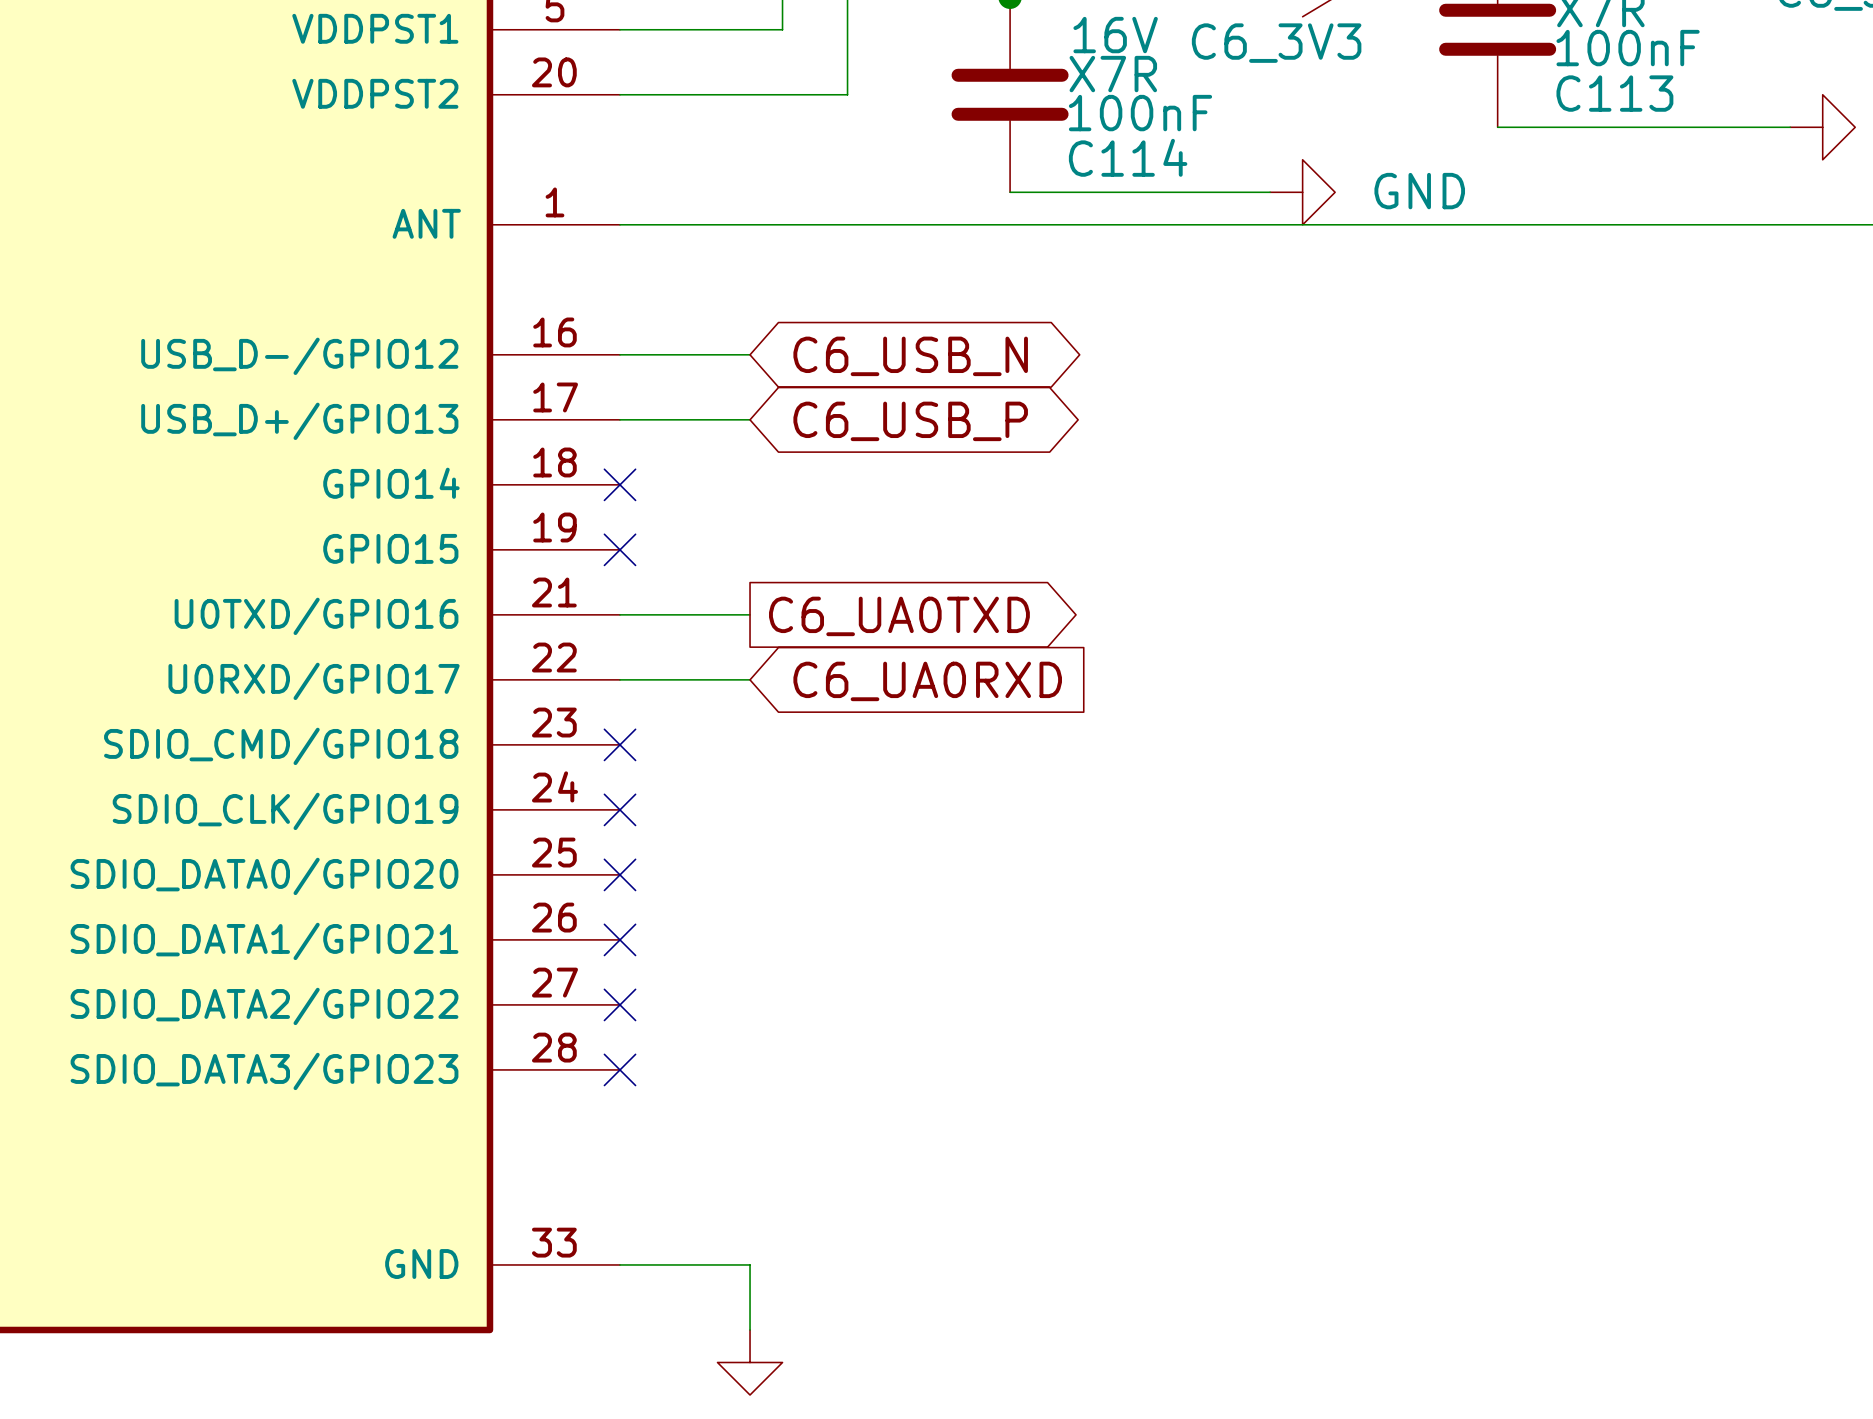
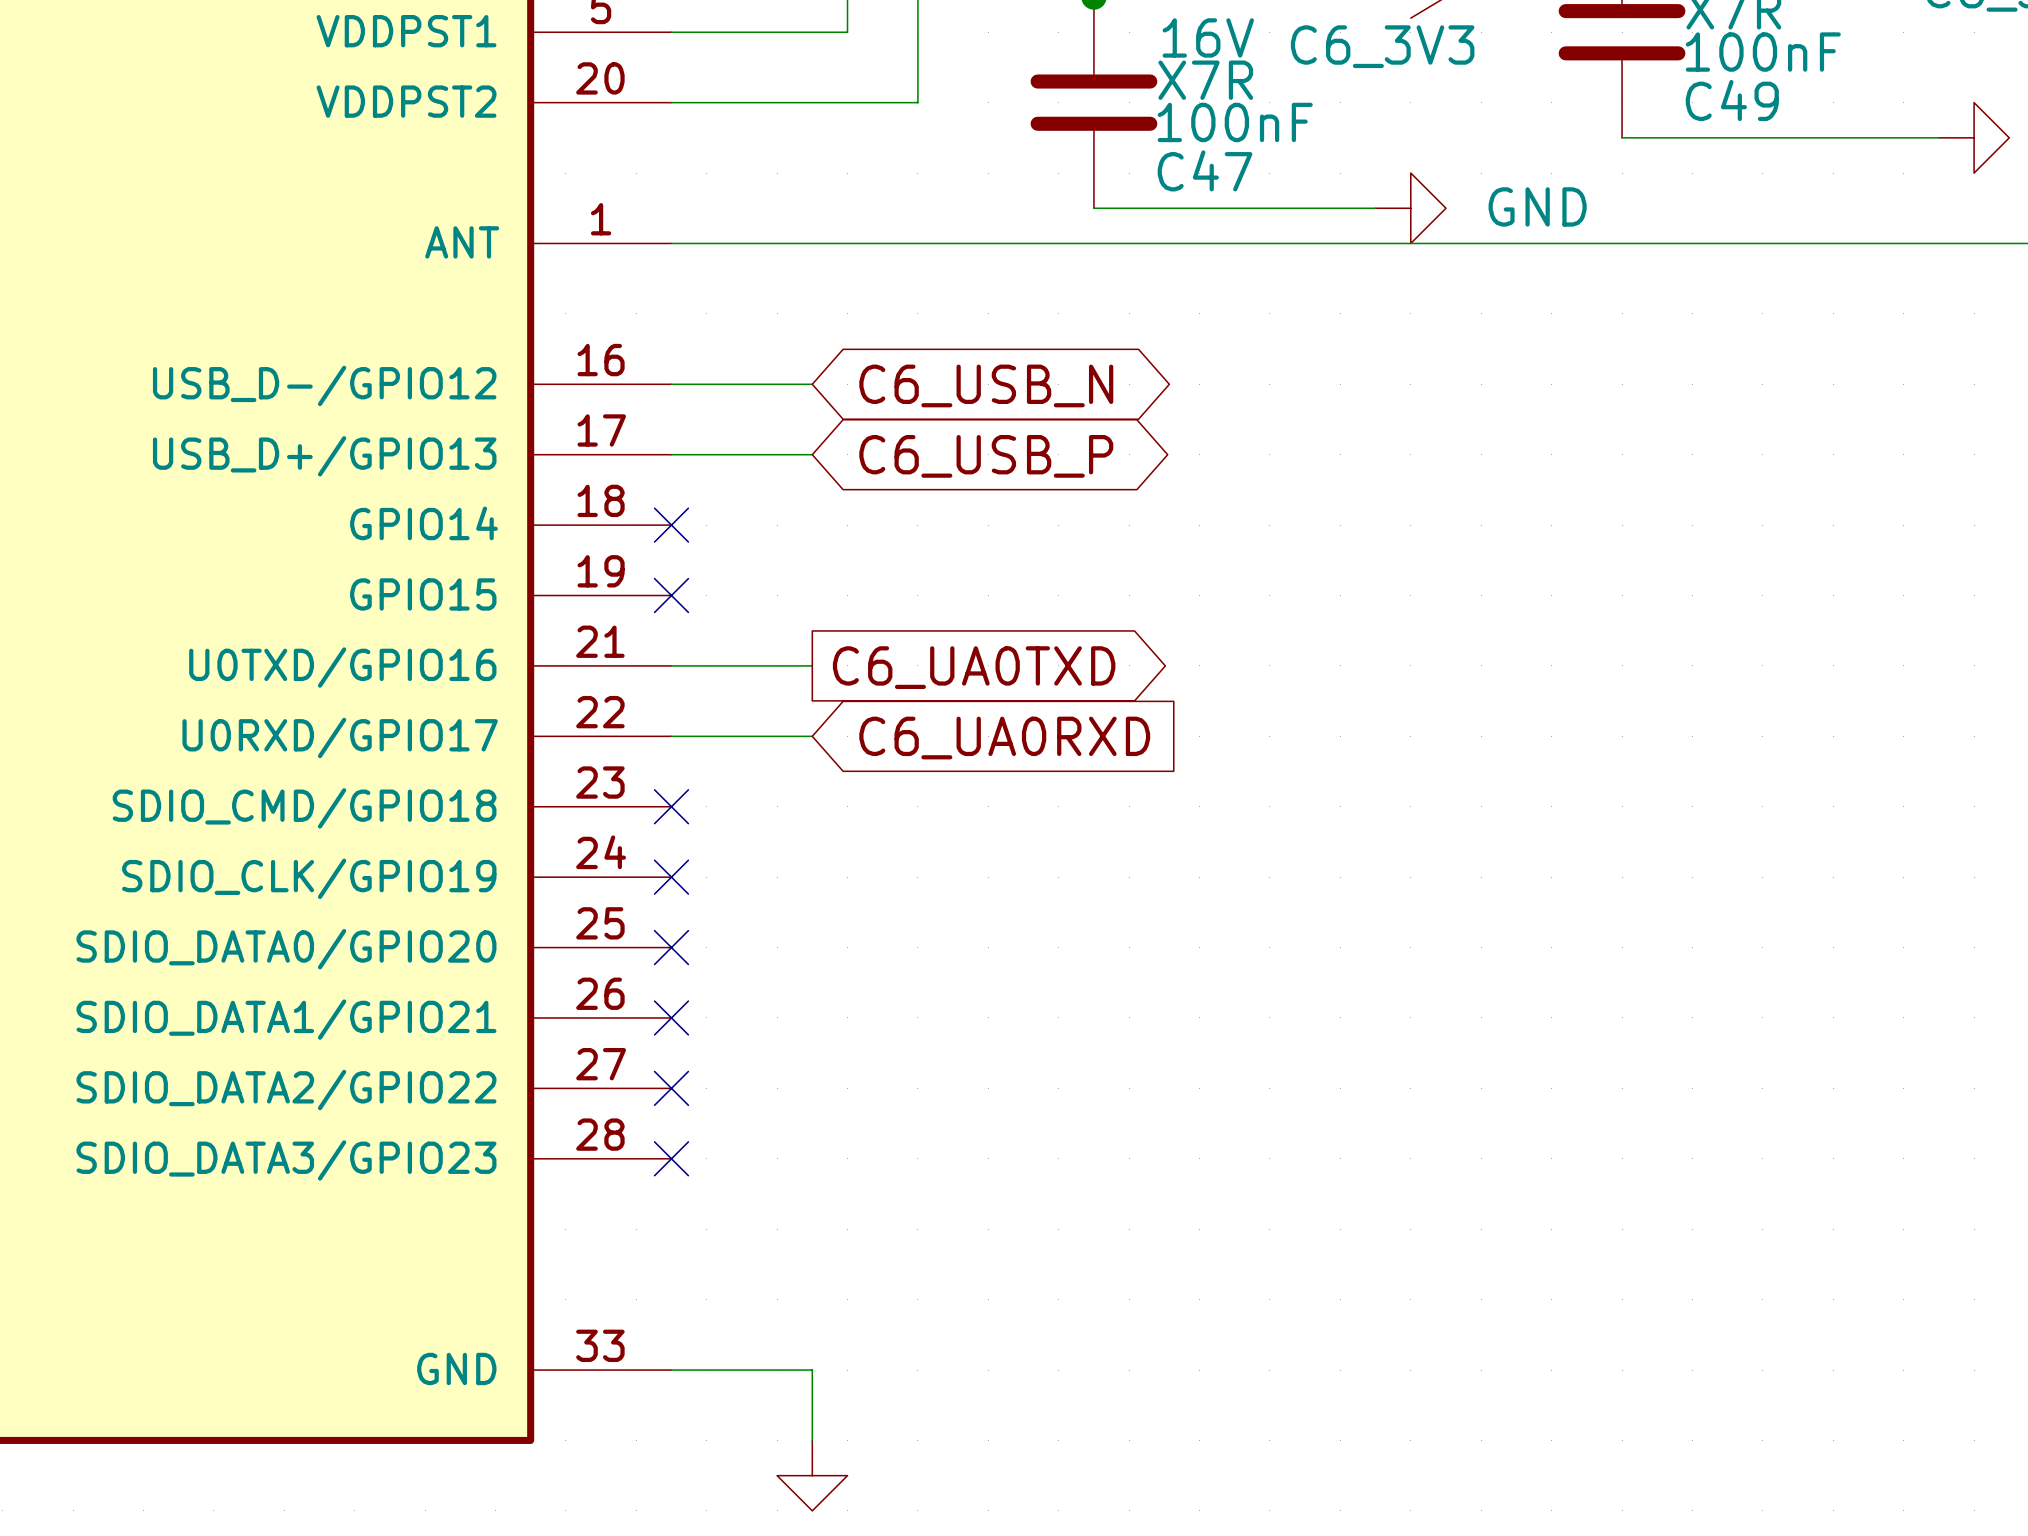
C113 name: C113 (1614, 93) -> C49 (1732, 100)
C114 name: C114 (1128, 157) -> C47 (1205, 170)

